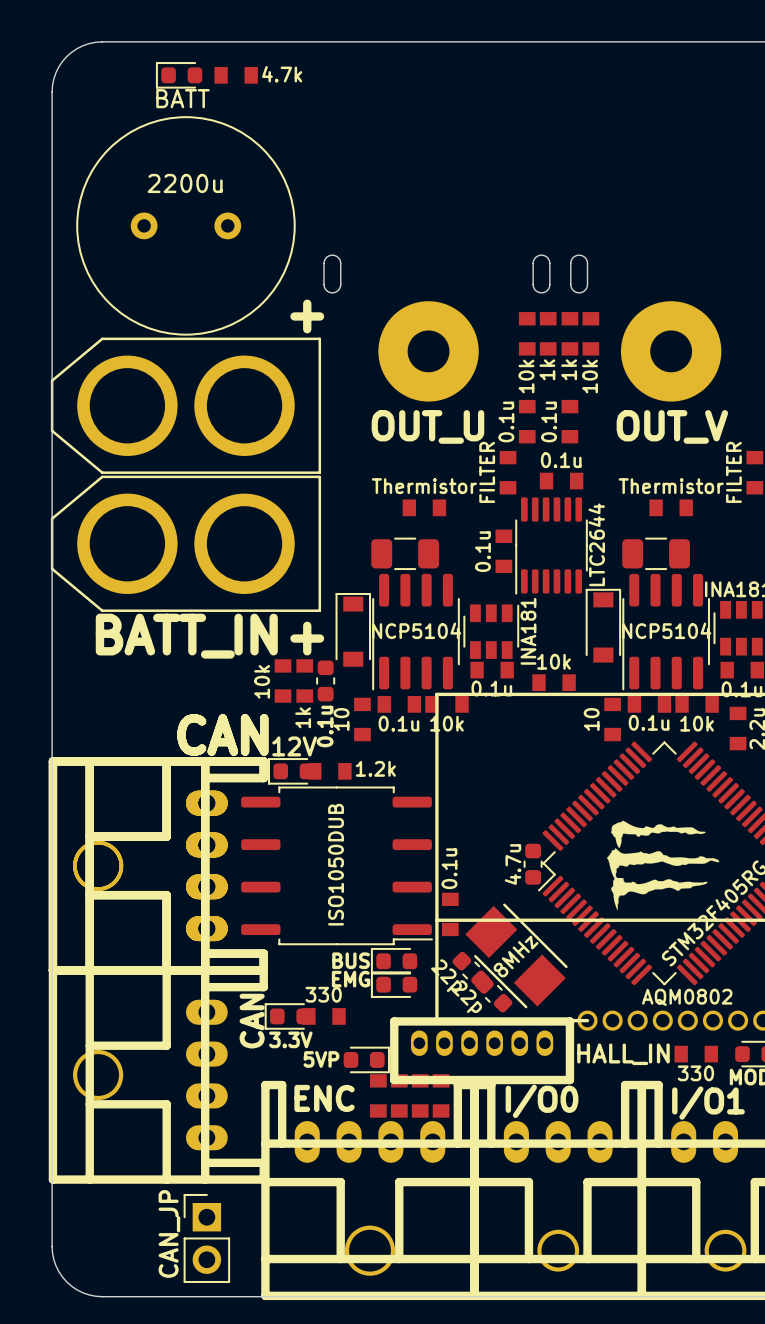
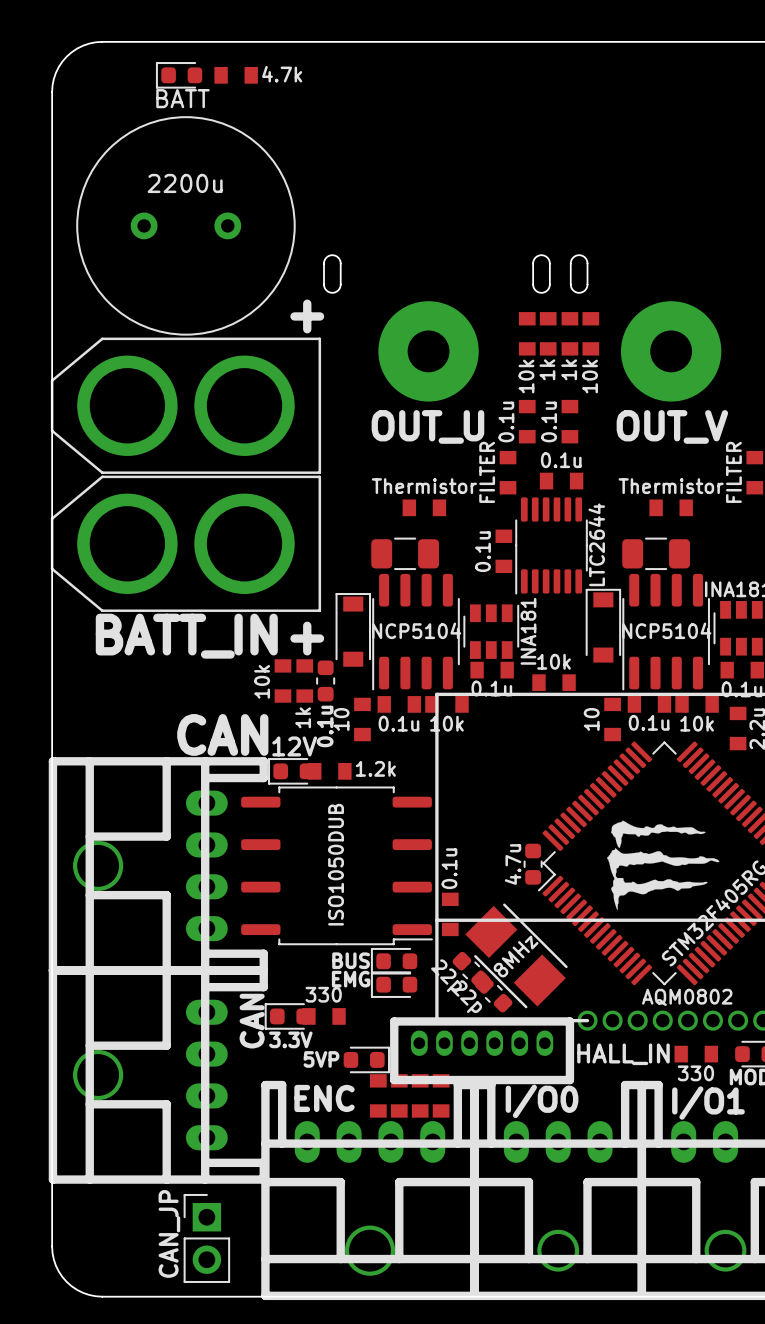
part: CAN (158, 865) -> none

